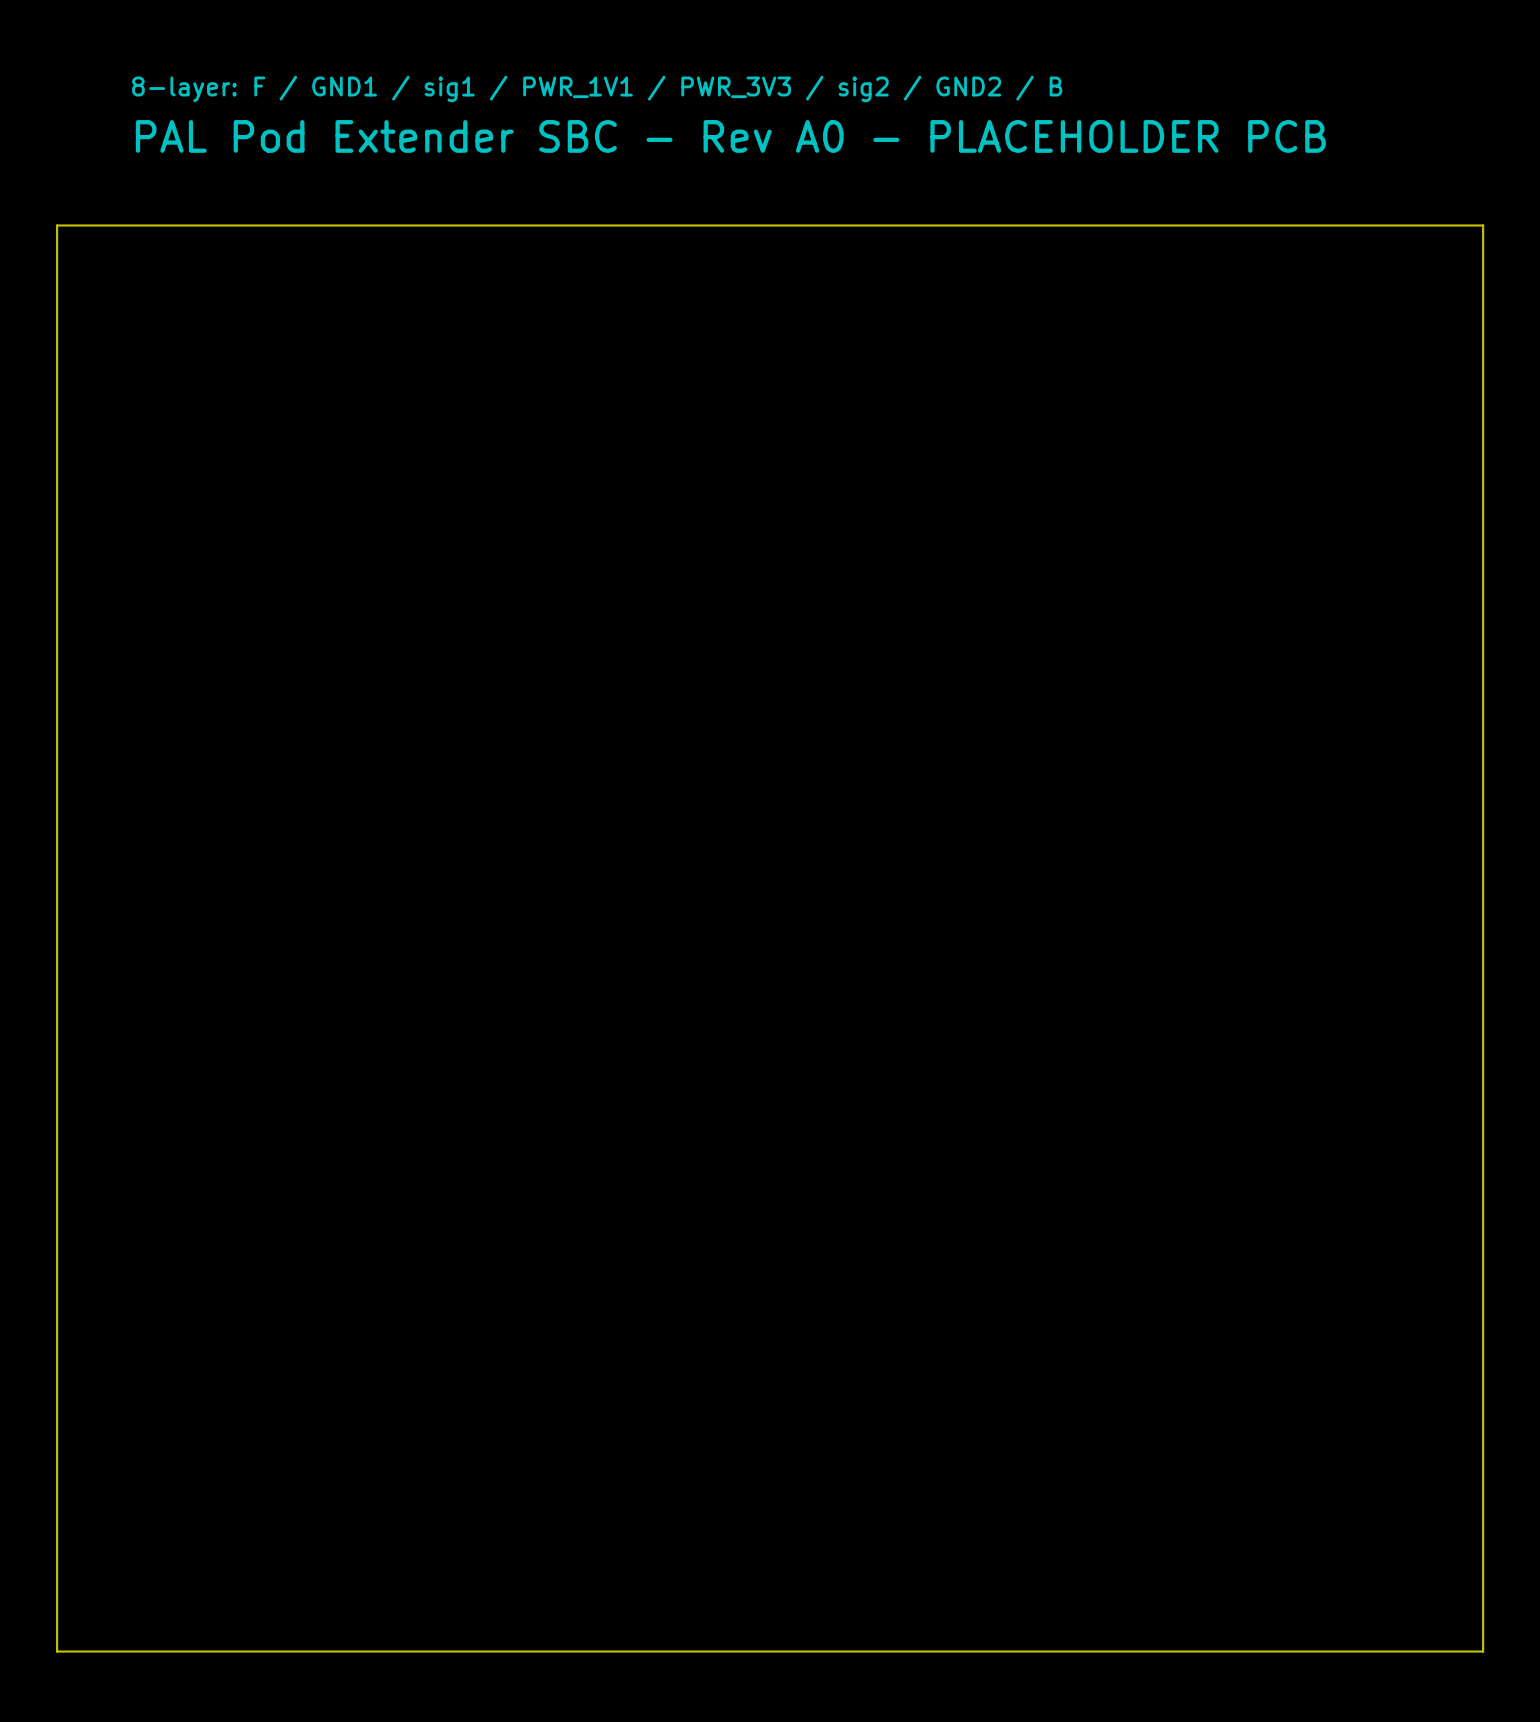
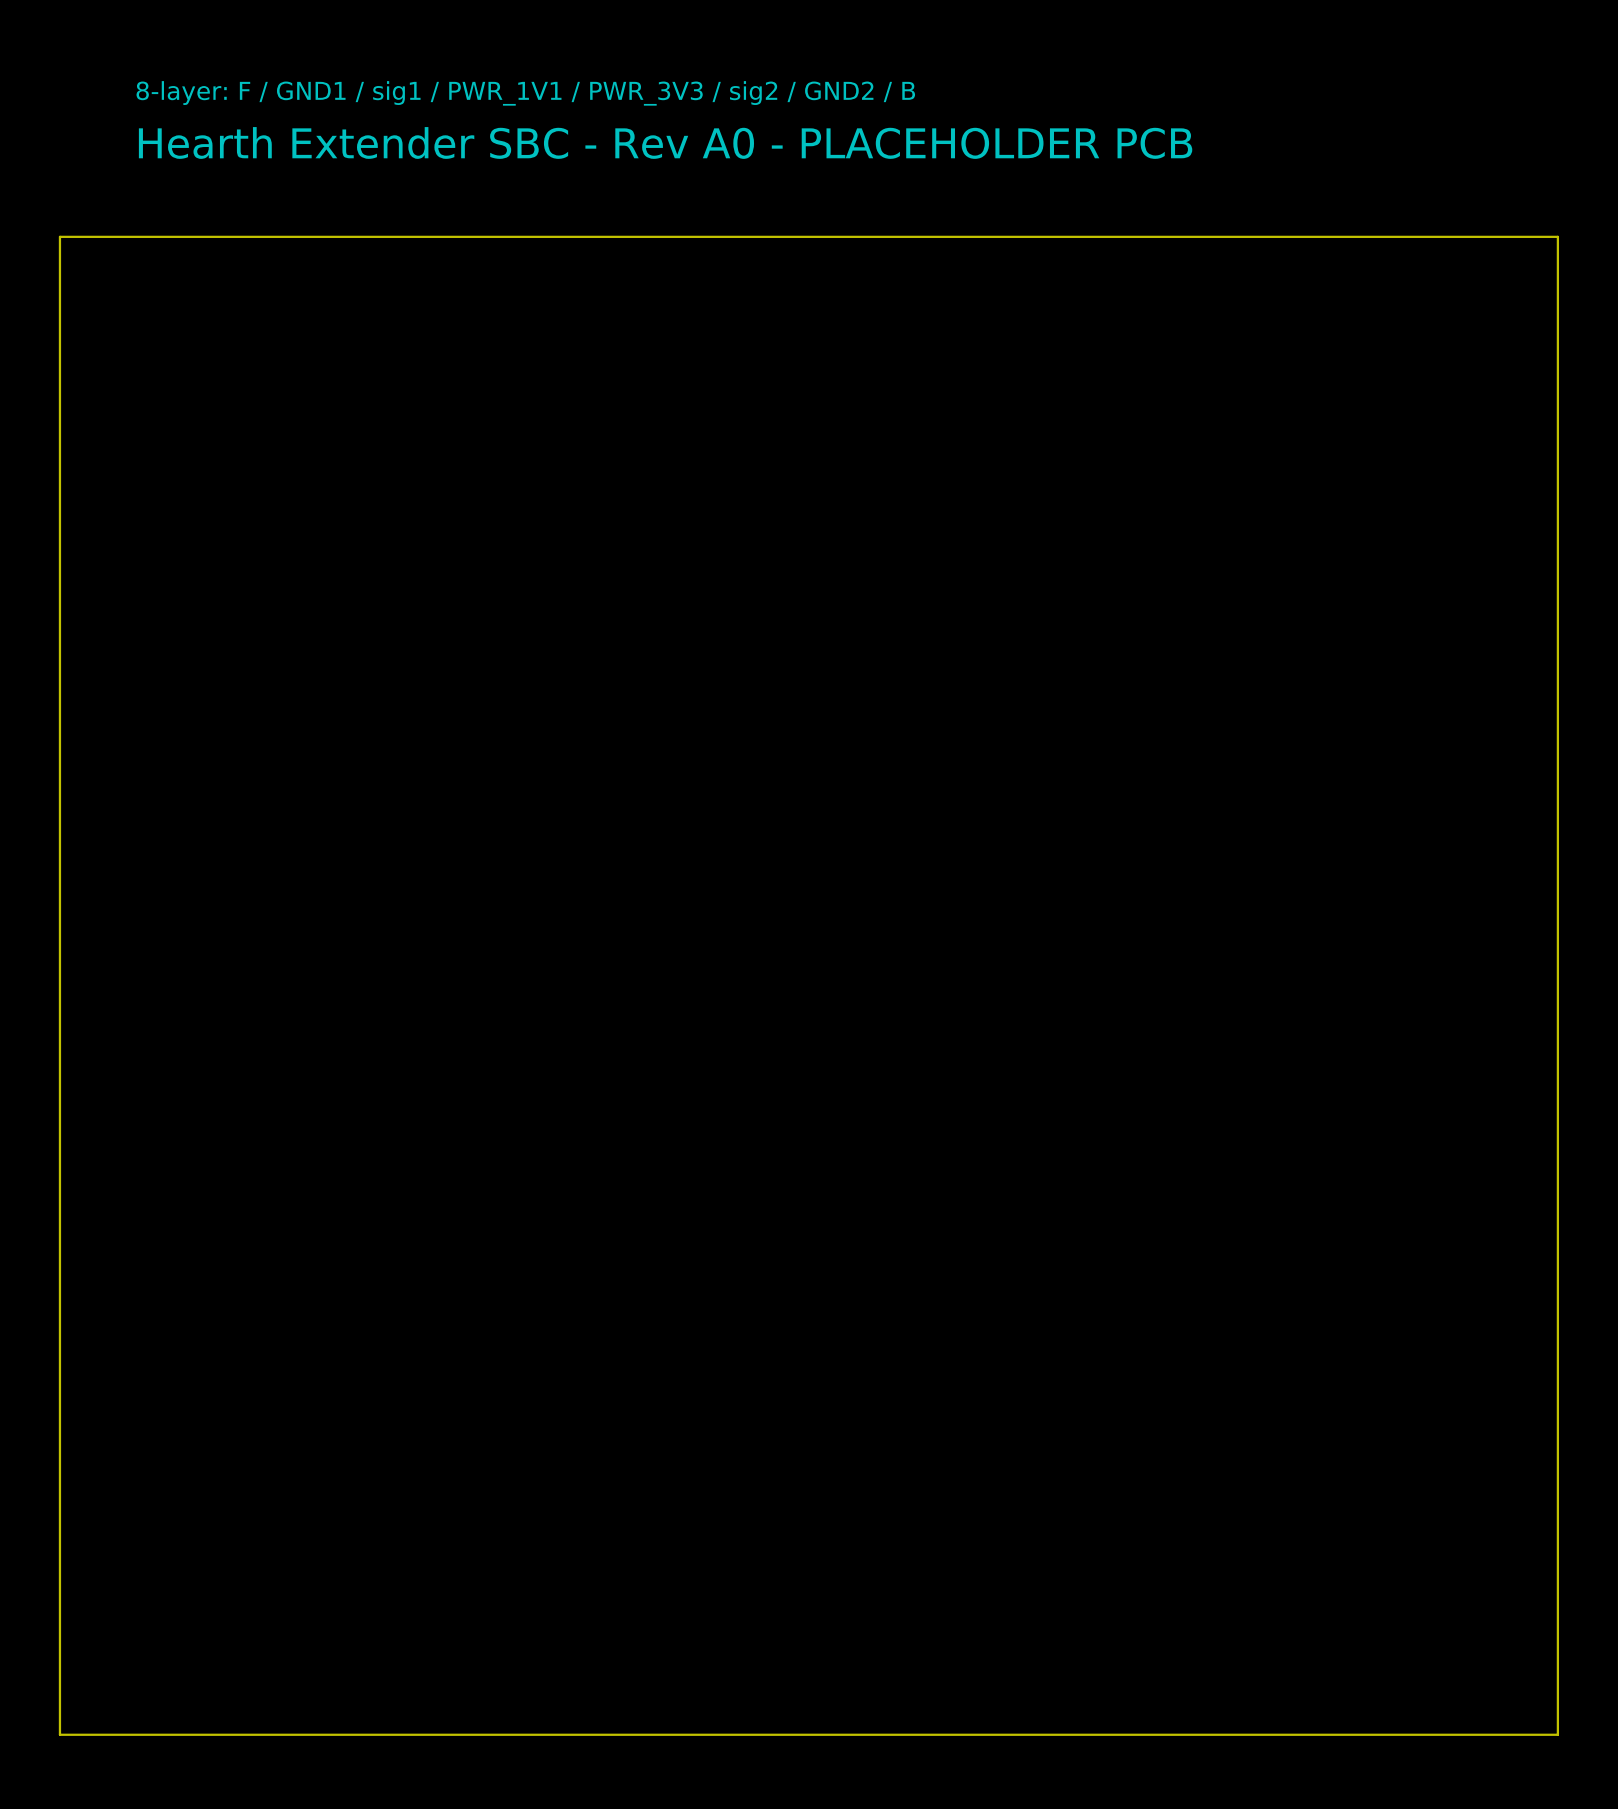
text: PAL Pod Extender SBC - Rev A0 - PLACEHOLDER PCB (730, 136) -> Hearth Extender SBC - Rev A0 - PLACEHOLDER PCB (665, 142)

